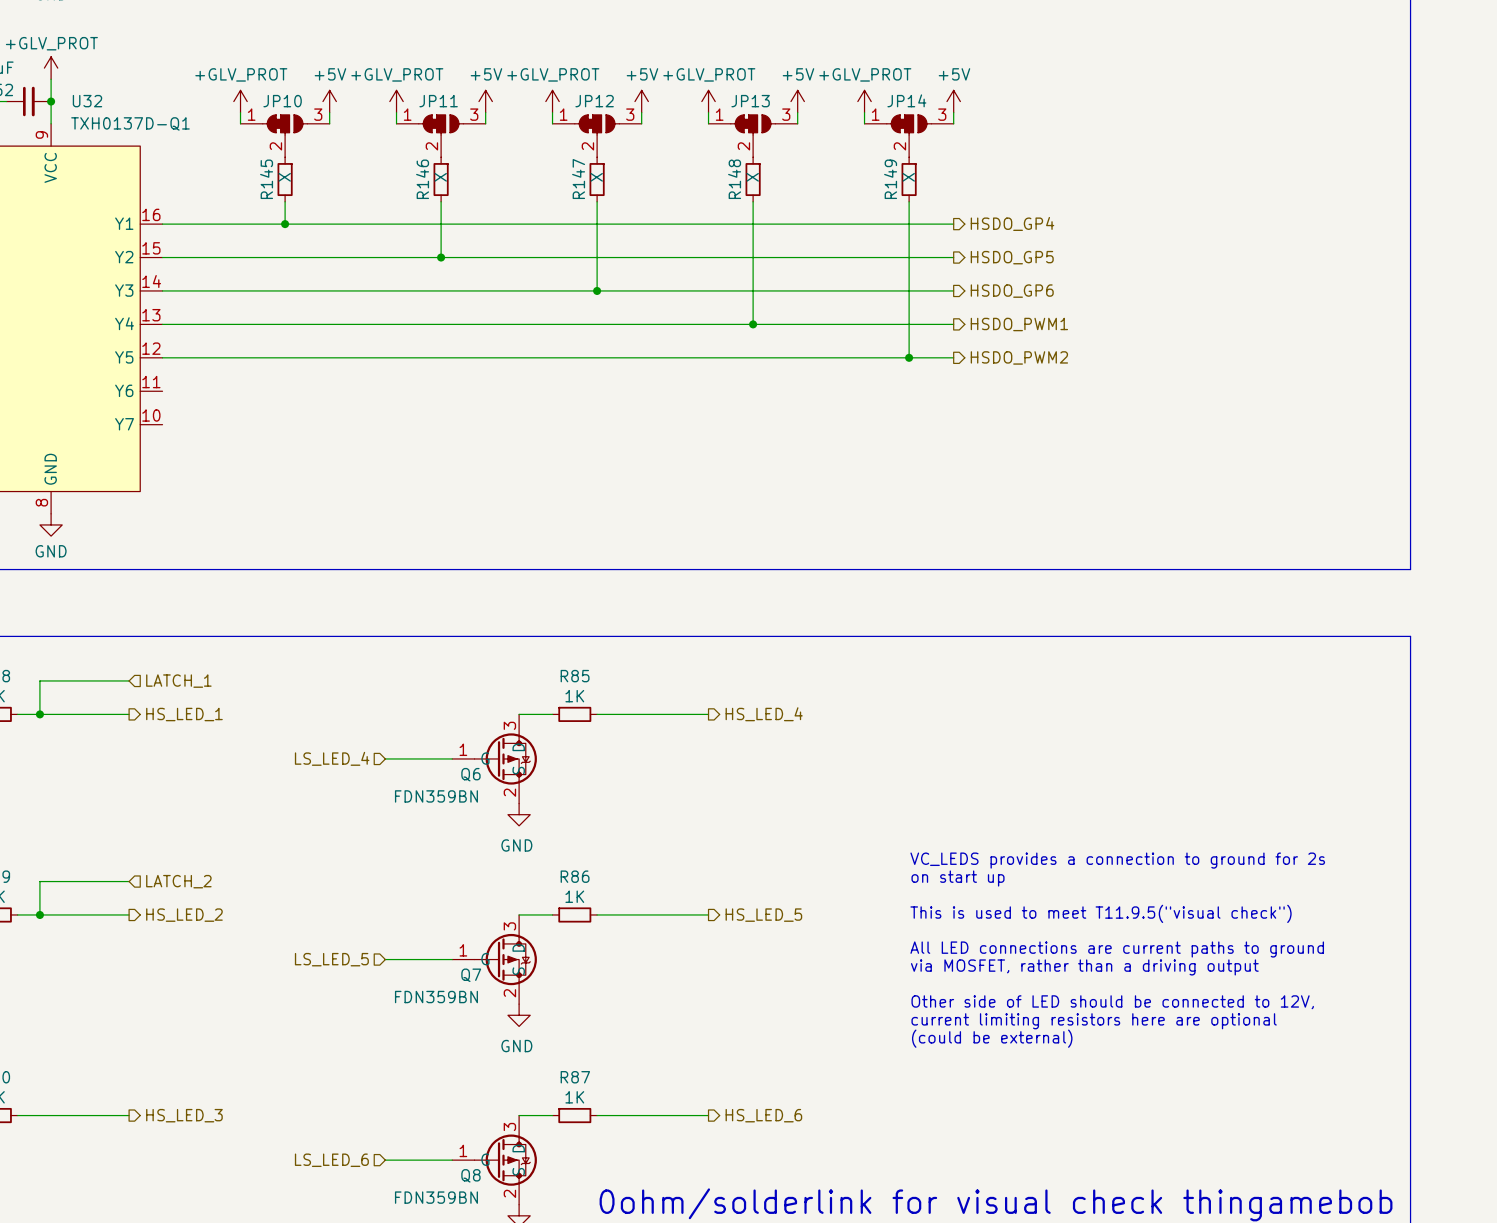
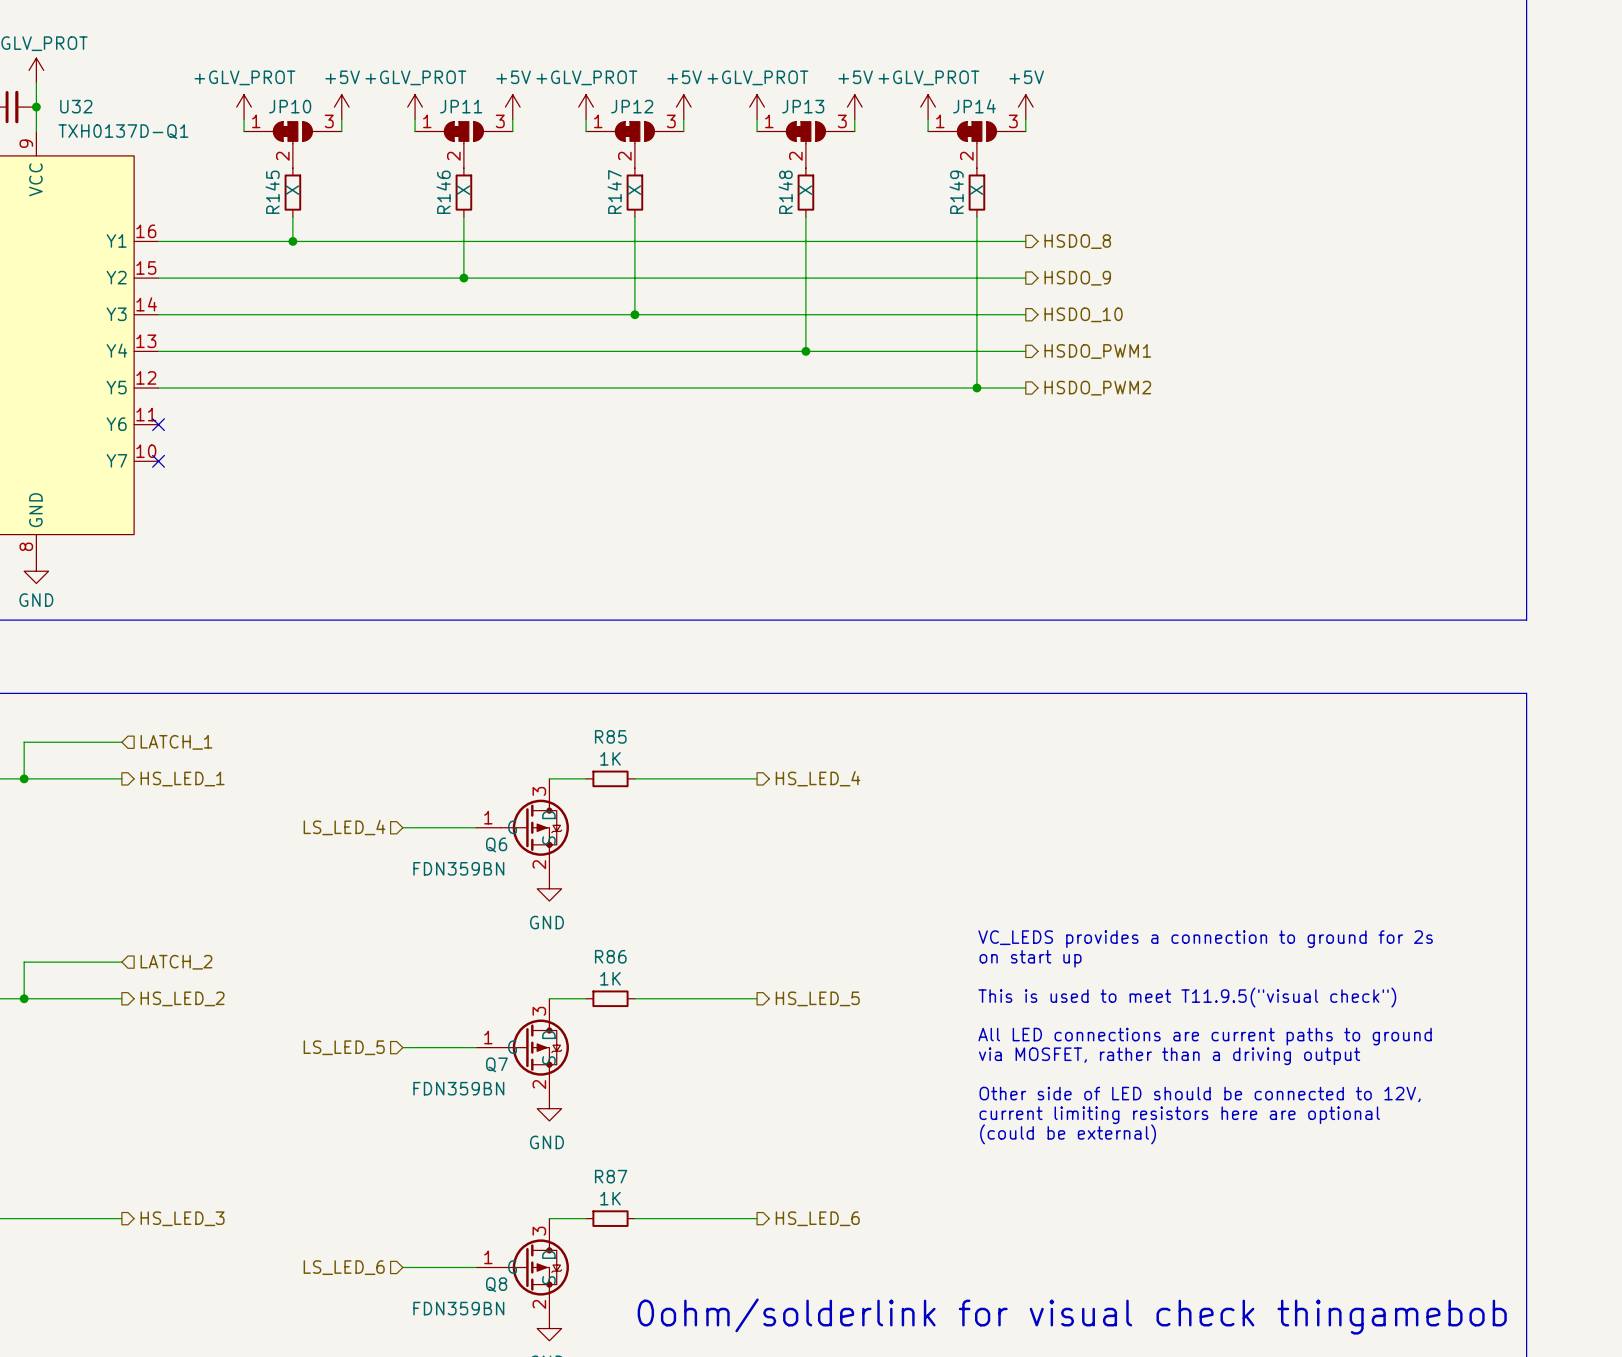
hierarchical label: HSDO_GP4 (1012, 223) -> HSDO_8 (1077, 241)
hierarchical label: HSDO_GP5 (1012, 257) -> HSDO_9 (1077, 278)
hierarchical label: HSDO_GP6 (1012, 291) -> HSDO_10 (1083, 314)
no-connect mark: none -> (158, 424)
no-connect mark: none -> (158, 461)

